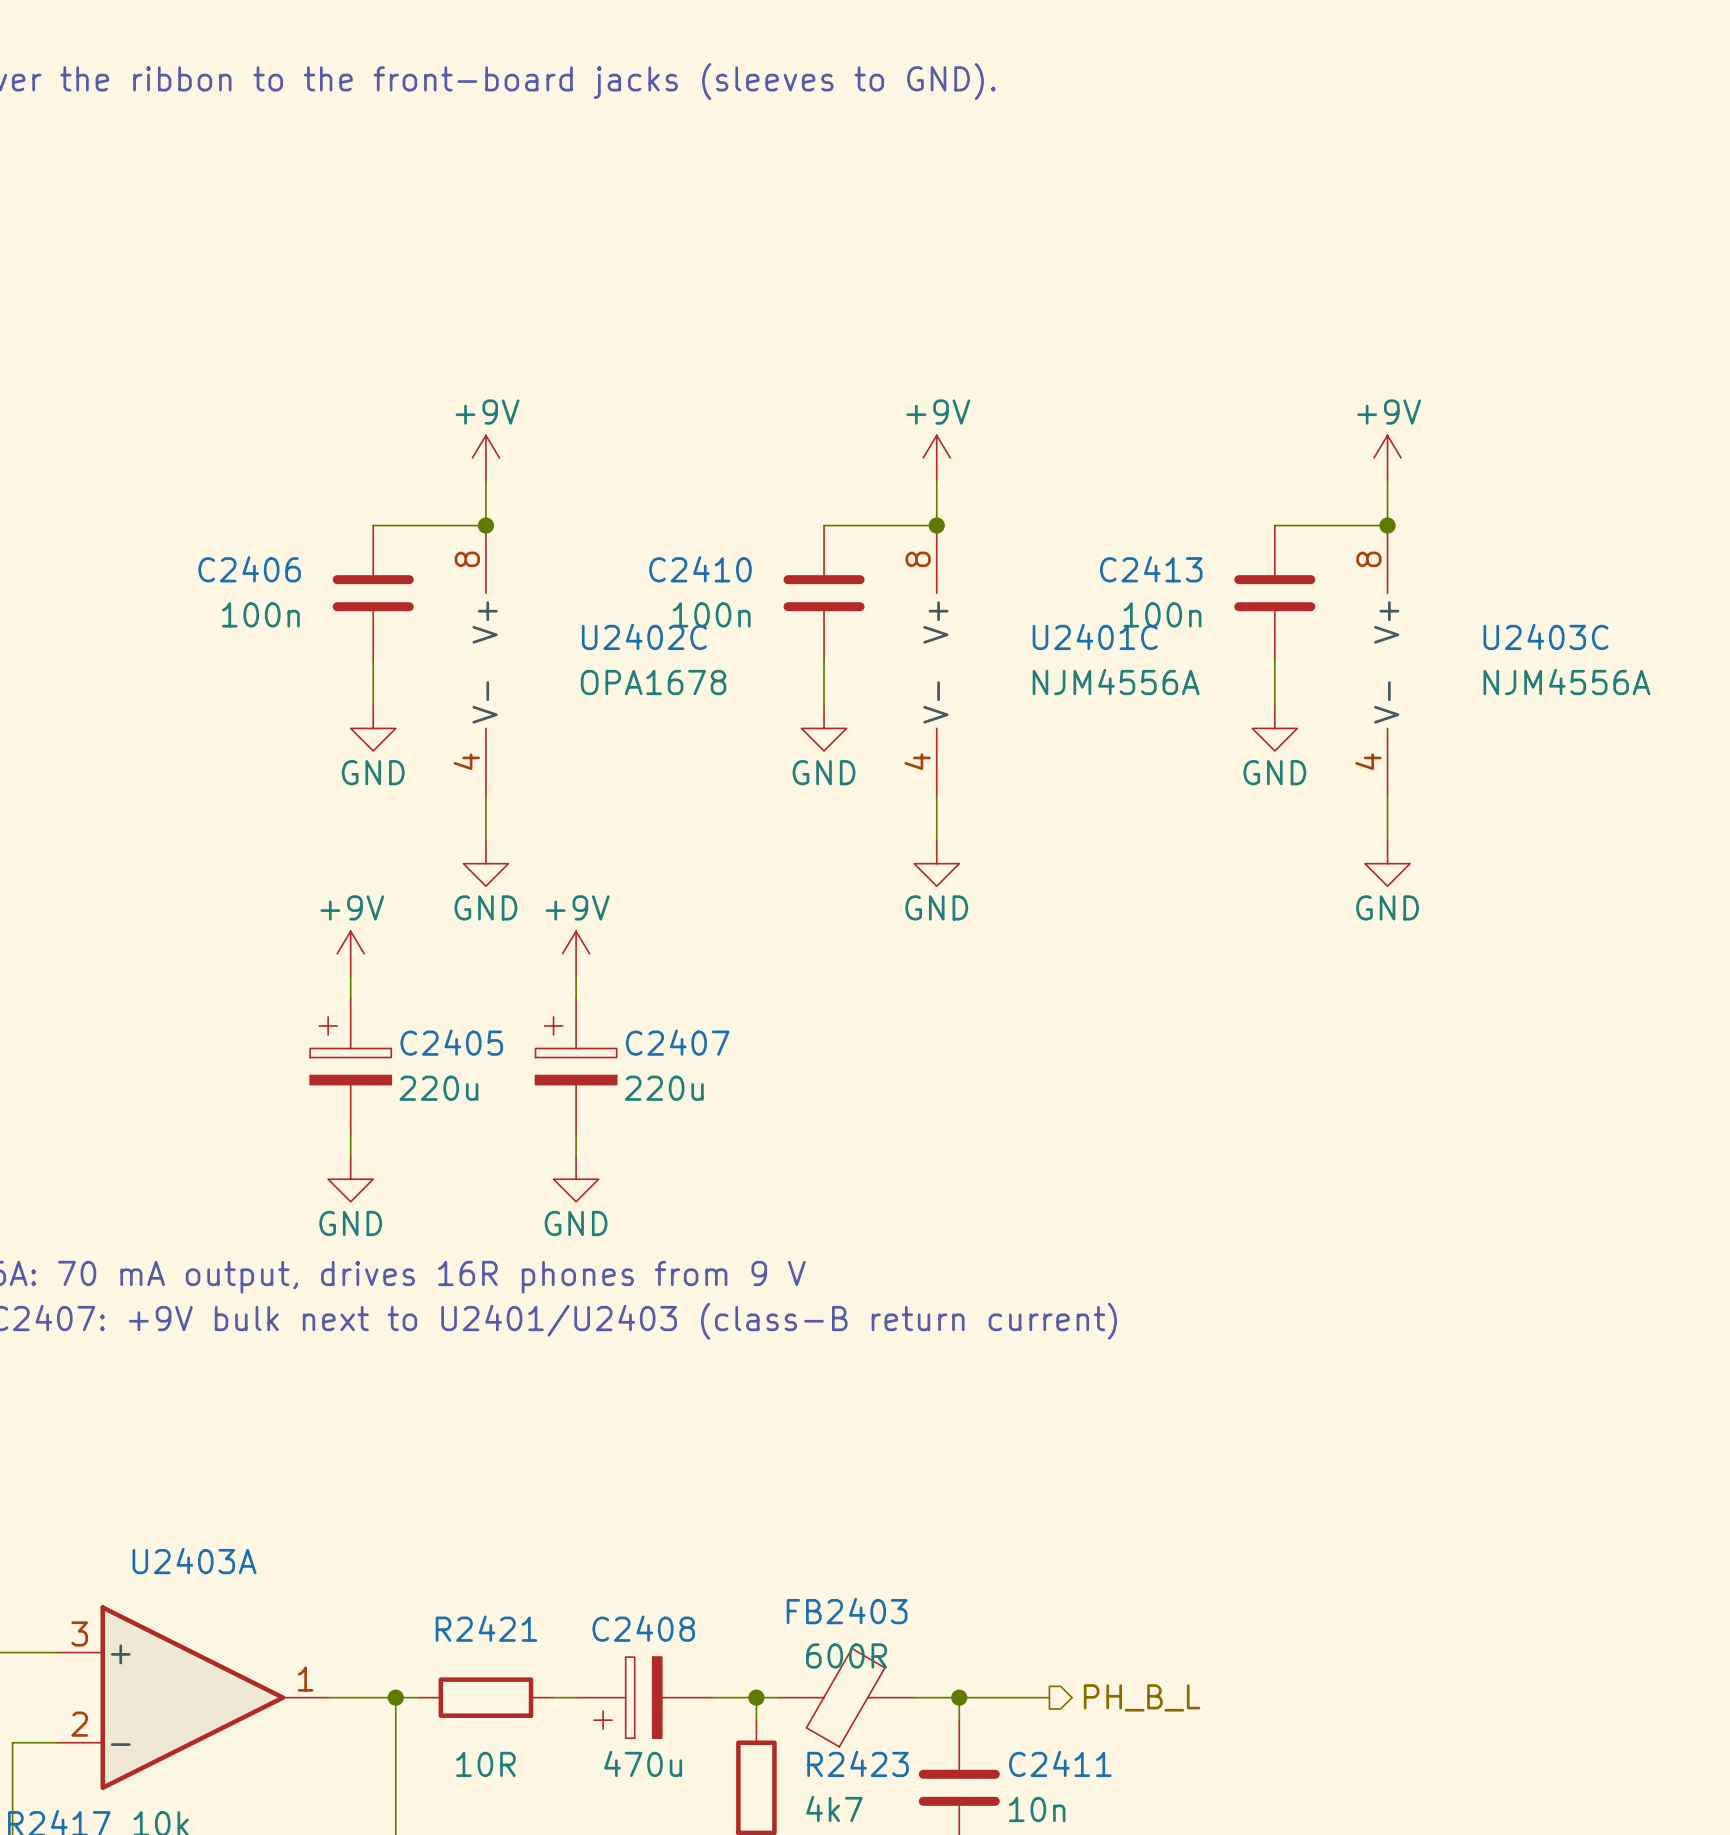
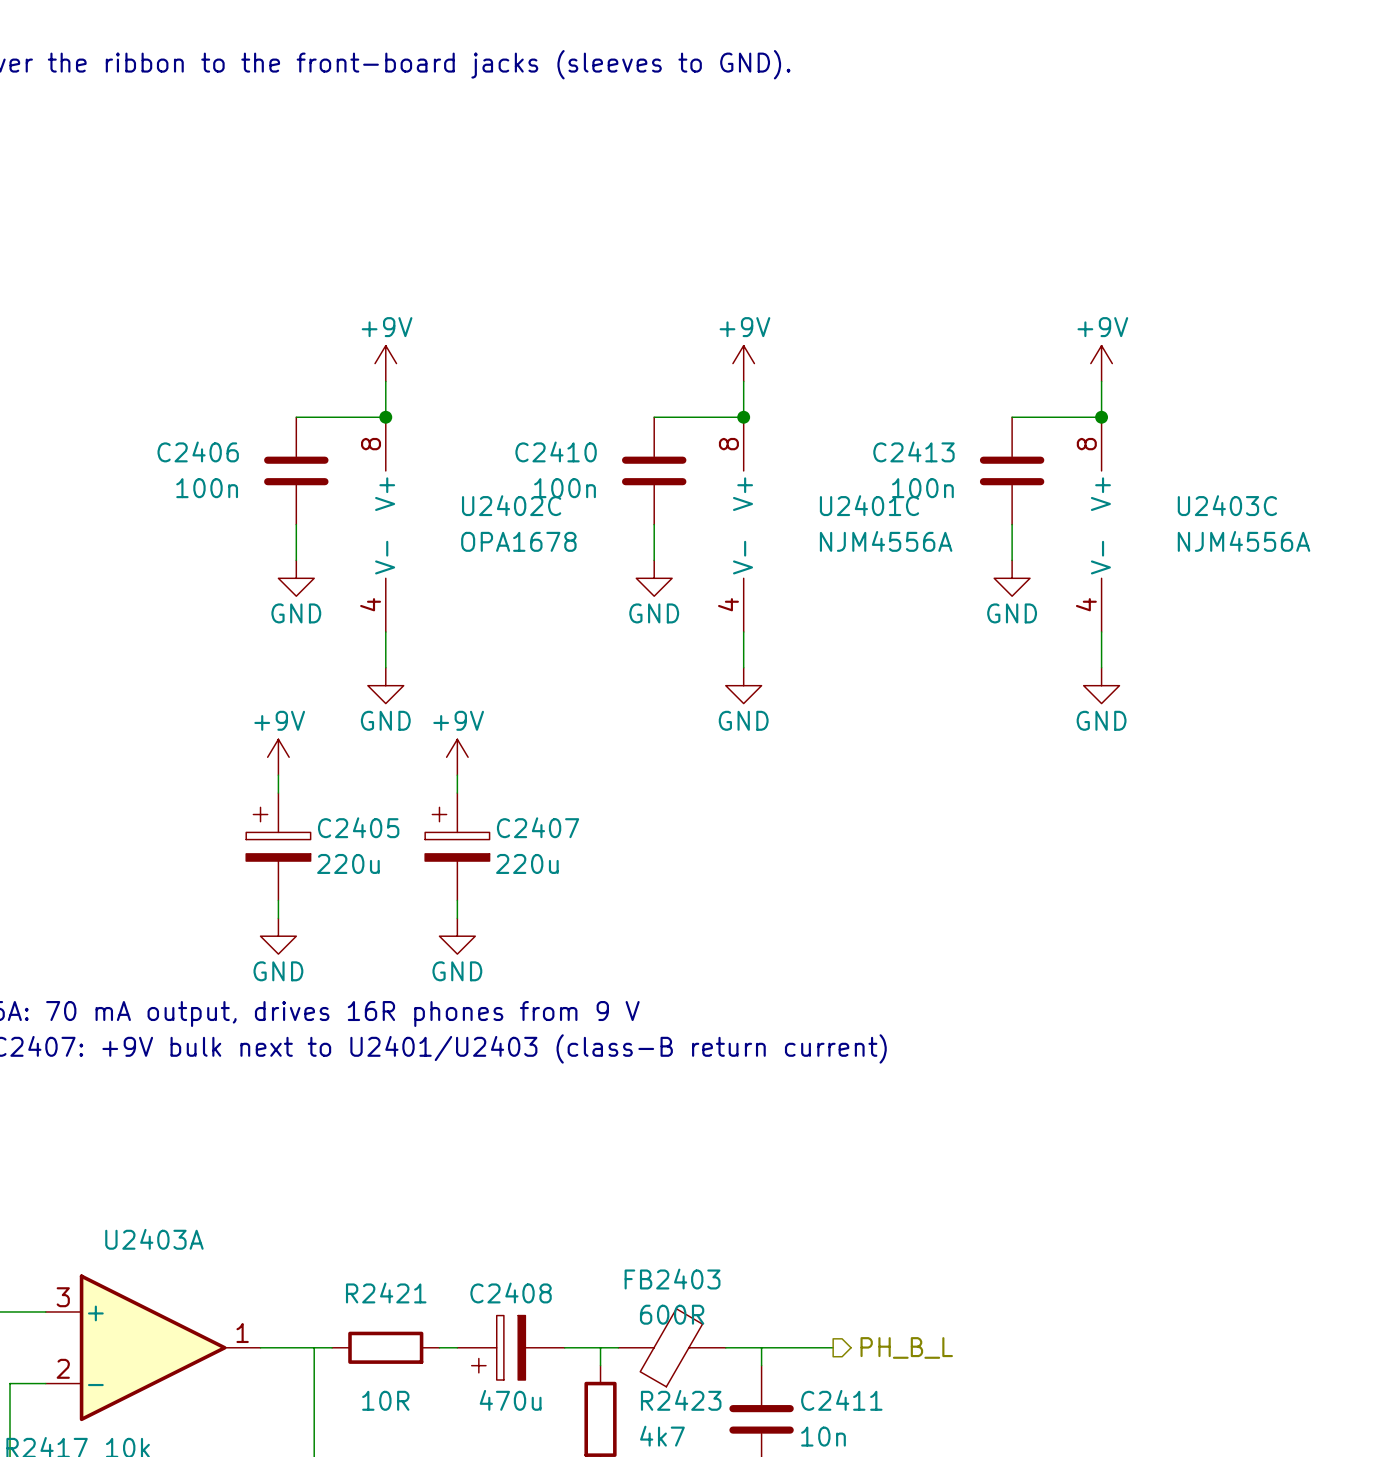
junction: (395, 1697) -> none
junction: (756, 1697) -> none
junction: (959, 1697) -> none

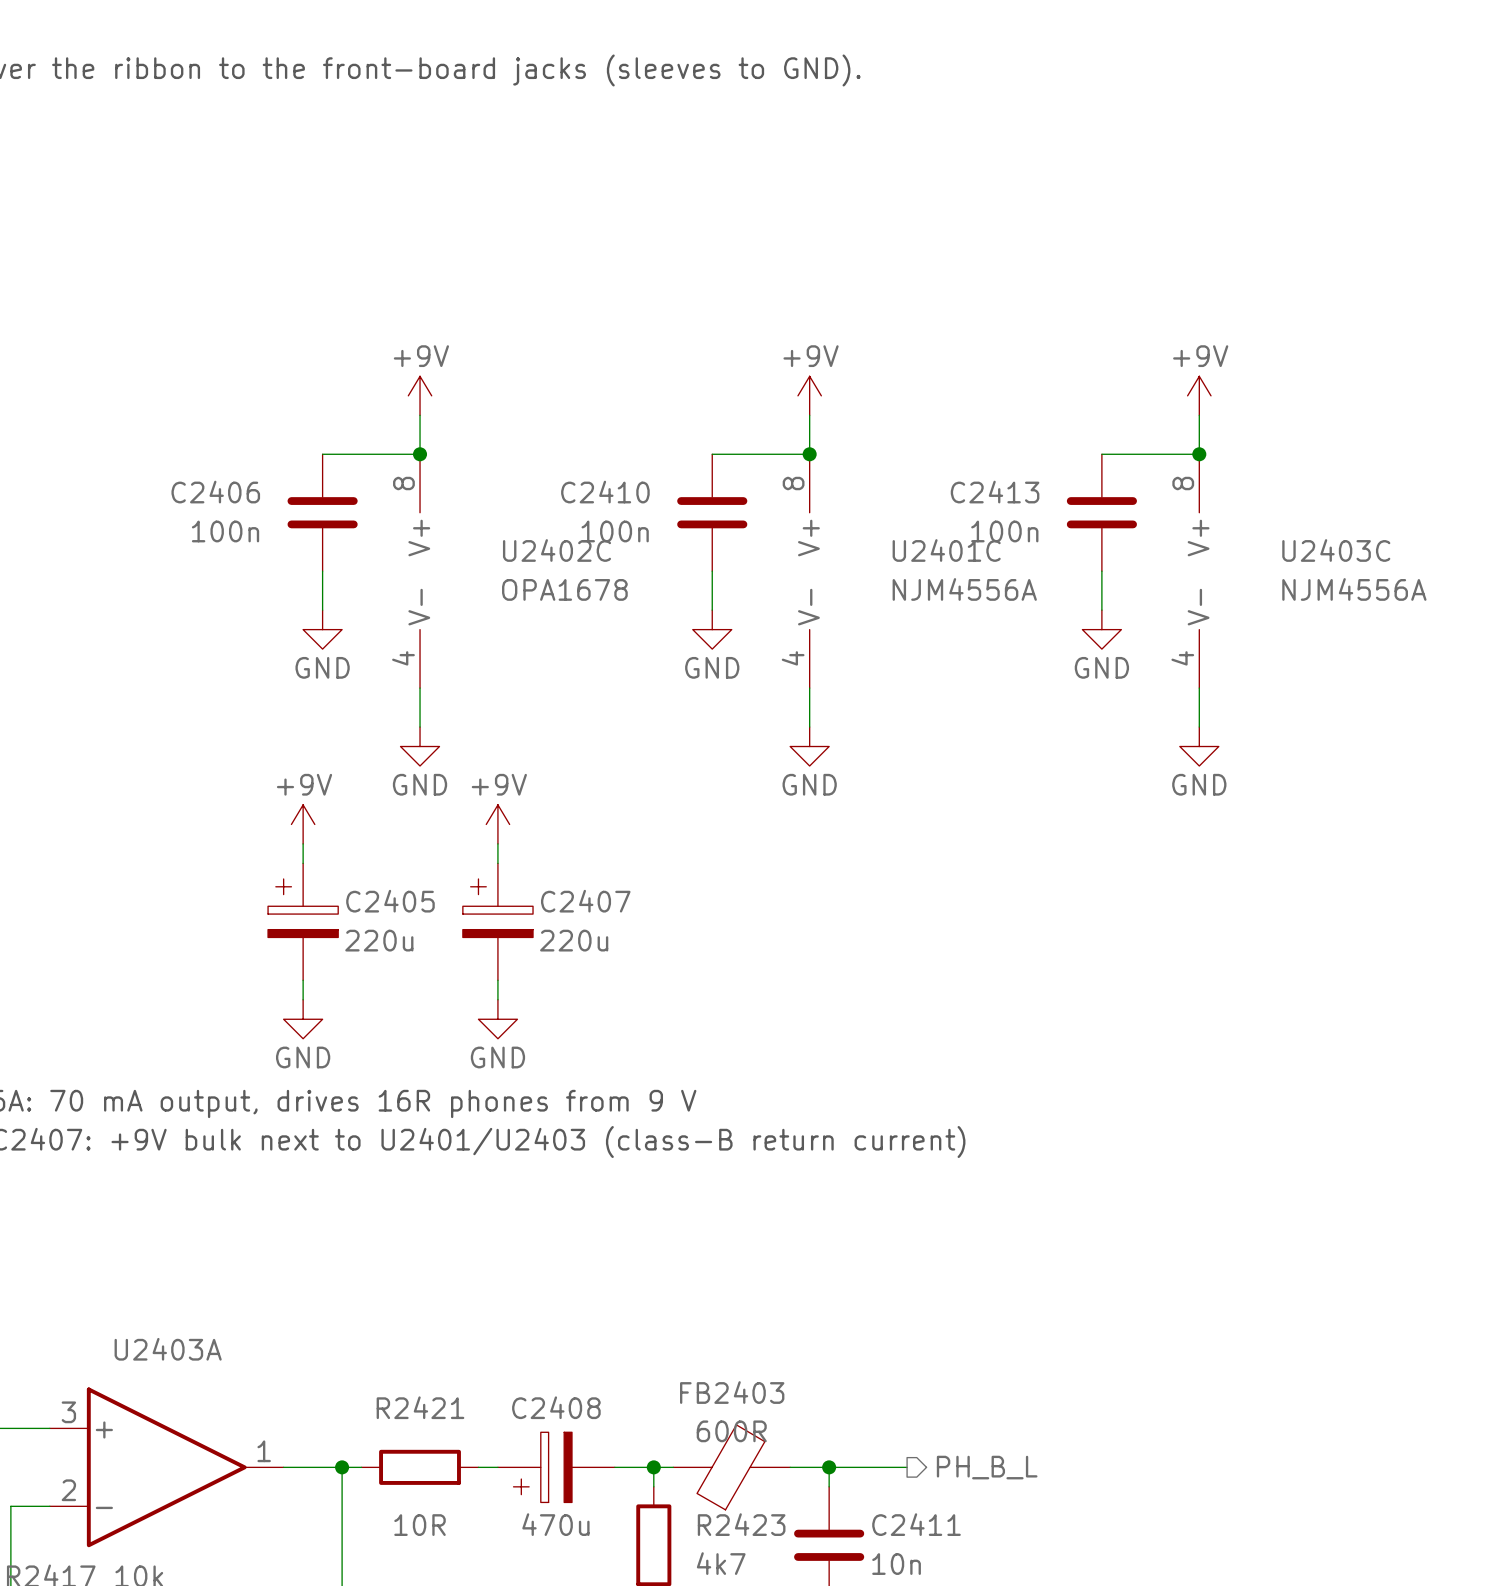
junction: none -> (342, 1467)
junction: none -> (653, 1467)
junction: none -> (829, 1467)

